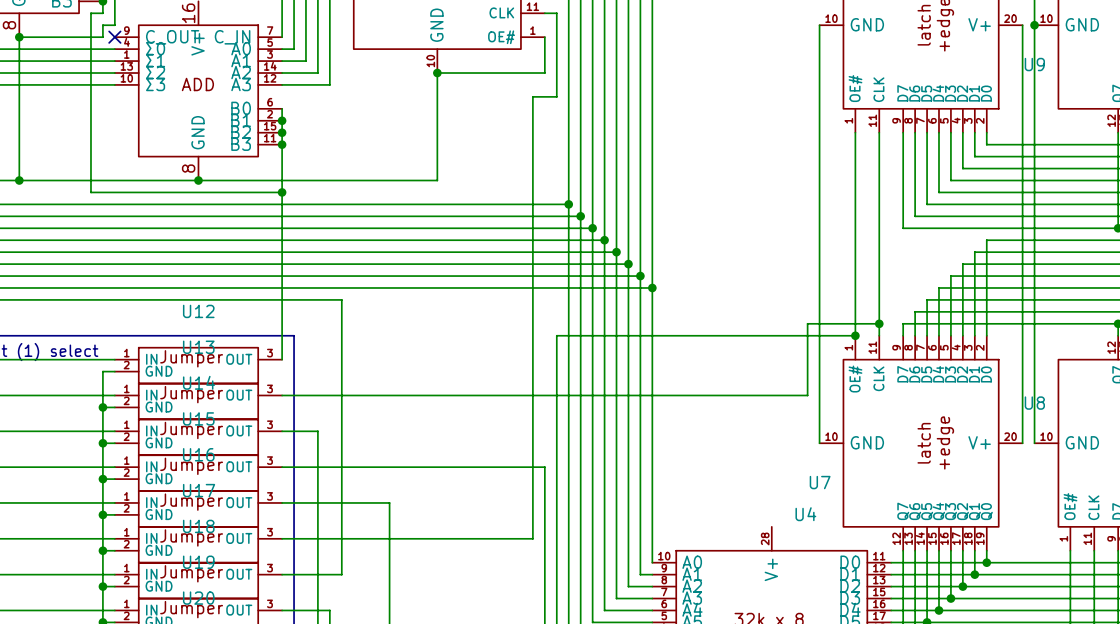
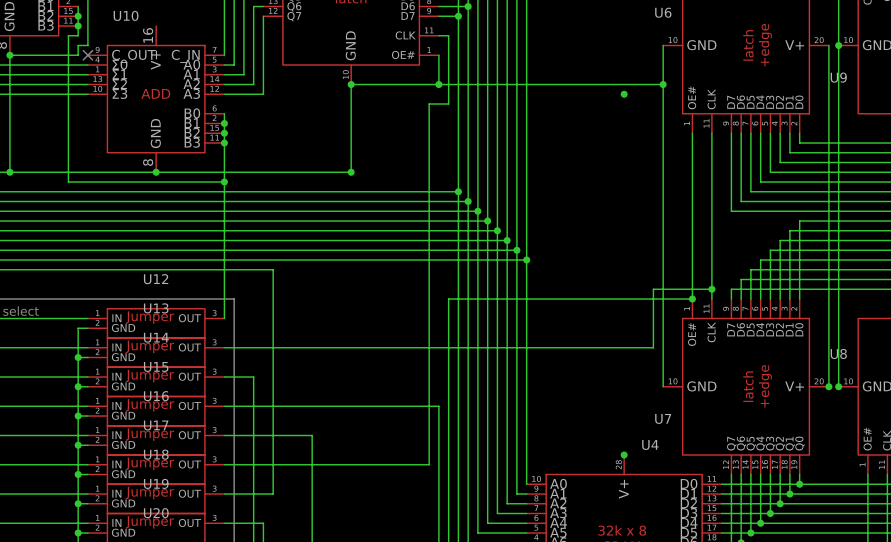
wire: none -> (438, 84) (663, 84)
junction: none -> (438, 84)
junction: none -> (663, 84)
junction: none -> (624, 94)
junction: none -> (351, 172)
junction: none -> (828, 386)
junction: none -> (838, 386)
junction: none -> (624, 455)

